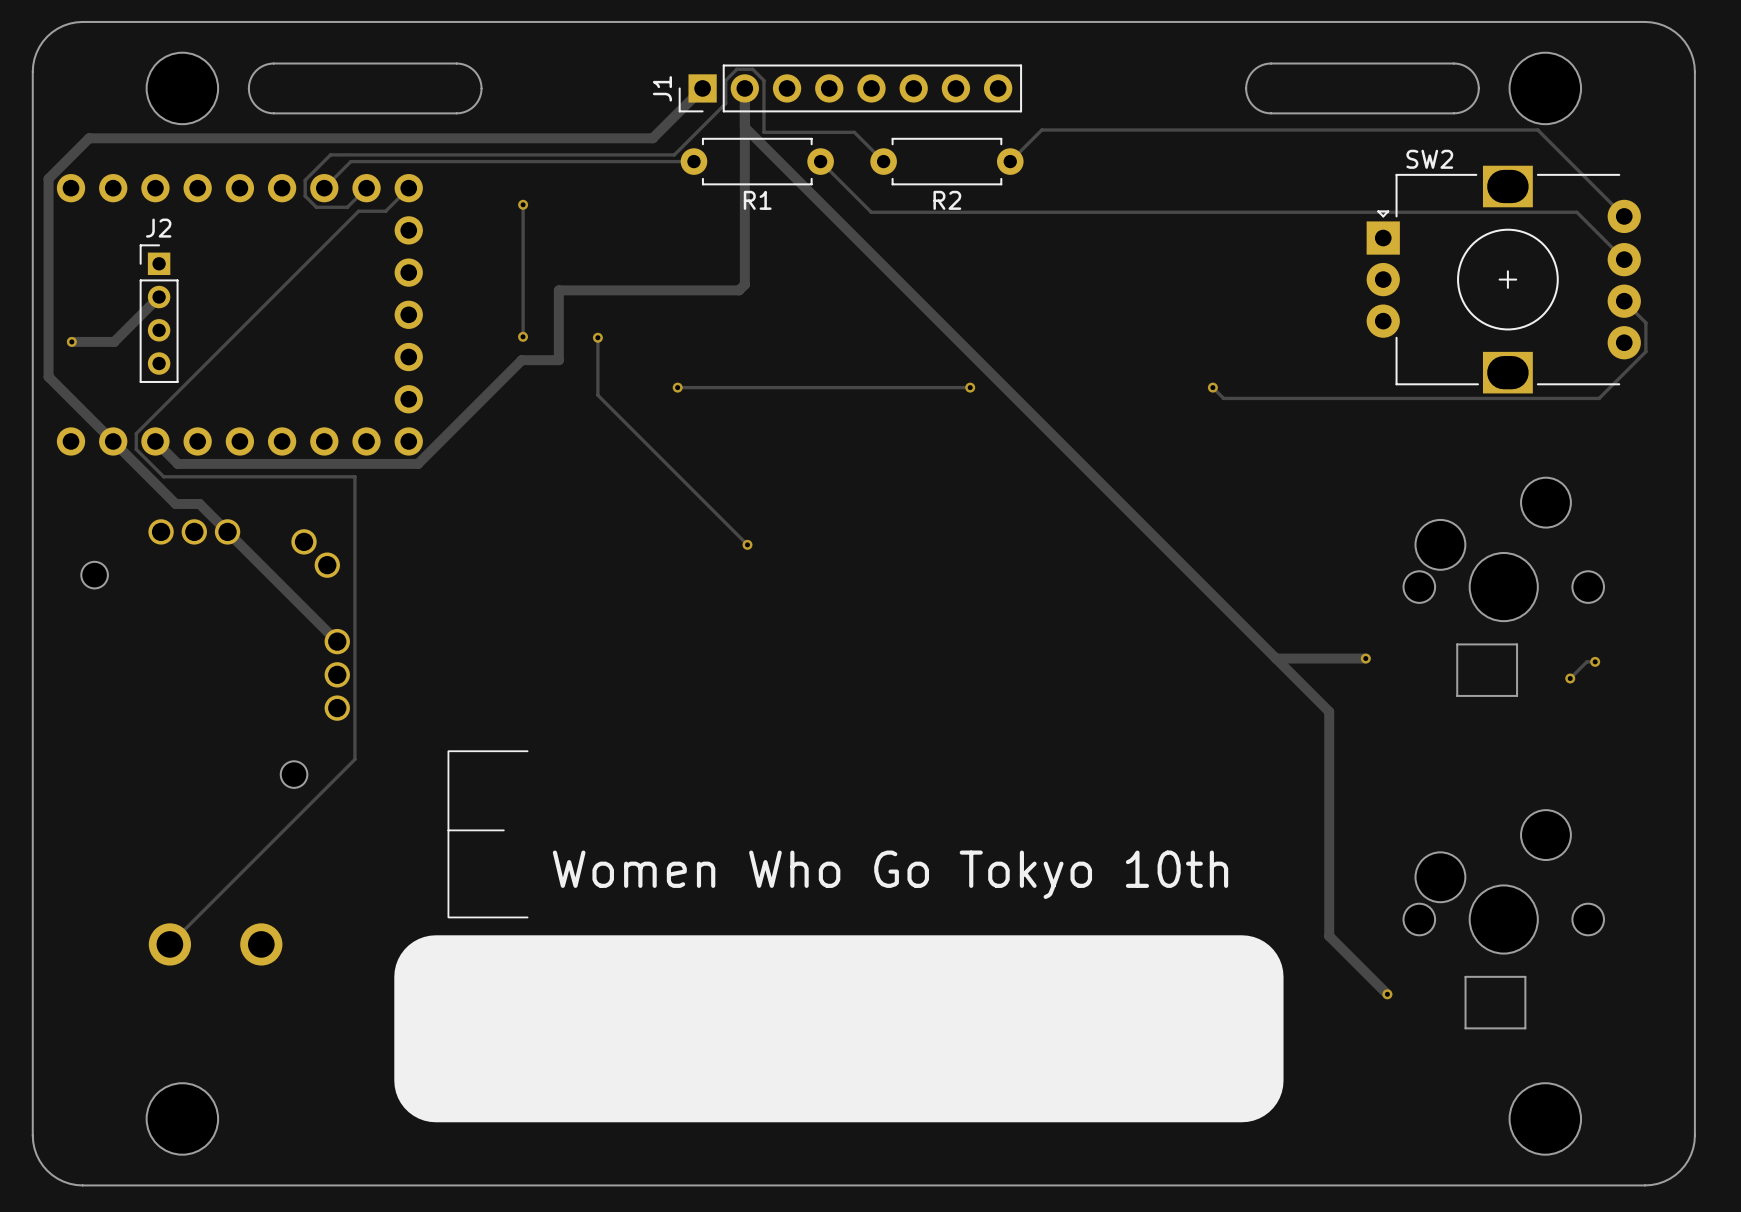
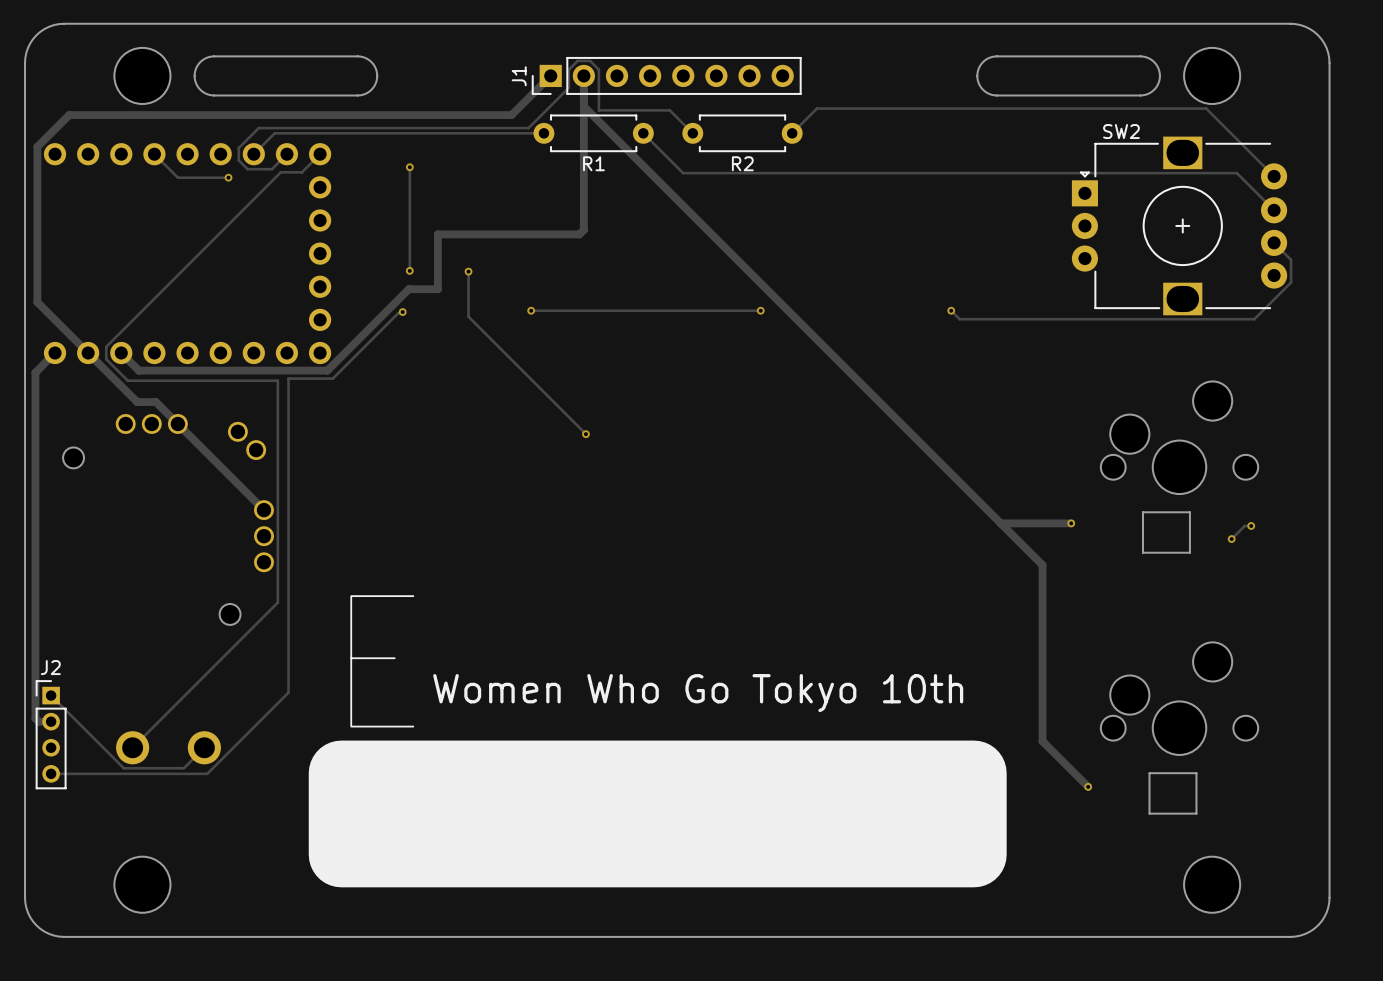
track: none -> (154, 154) (177, 177) (228, 177)
via: none -> (228, 177)
track: (159, 297) (114, 341) (71, 341) -> none
J2 position: (159, 313) -> (51, 734)
via: (71, 341) -> none
track: none -> (402, 312) (398, 313) (332, 378) (288, 378) (288, 692) (207, 773) (51, 773)
via: none -> (402, 312)
track: none -> (55, 353) (35, 372) (35, 718) (38, 721) (51, 721)
track: none -> (51, 695) (123, 768) (183, 768) (204, 747)

